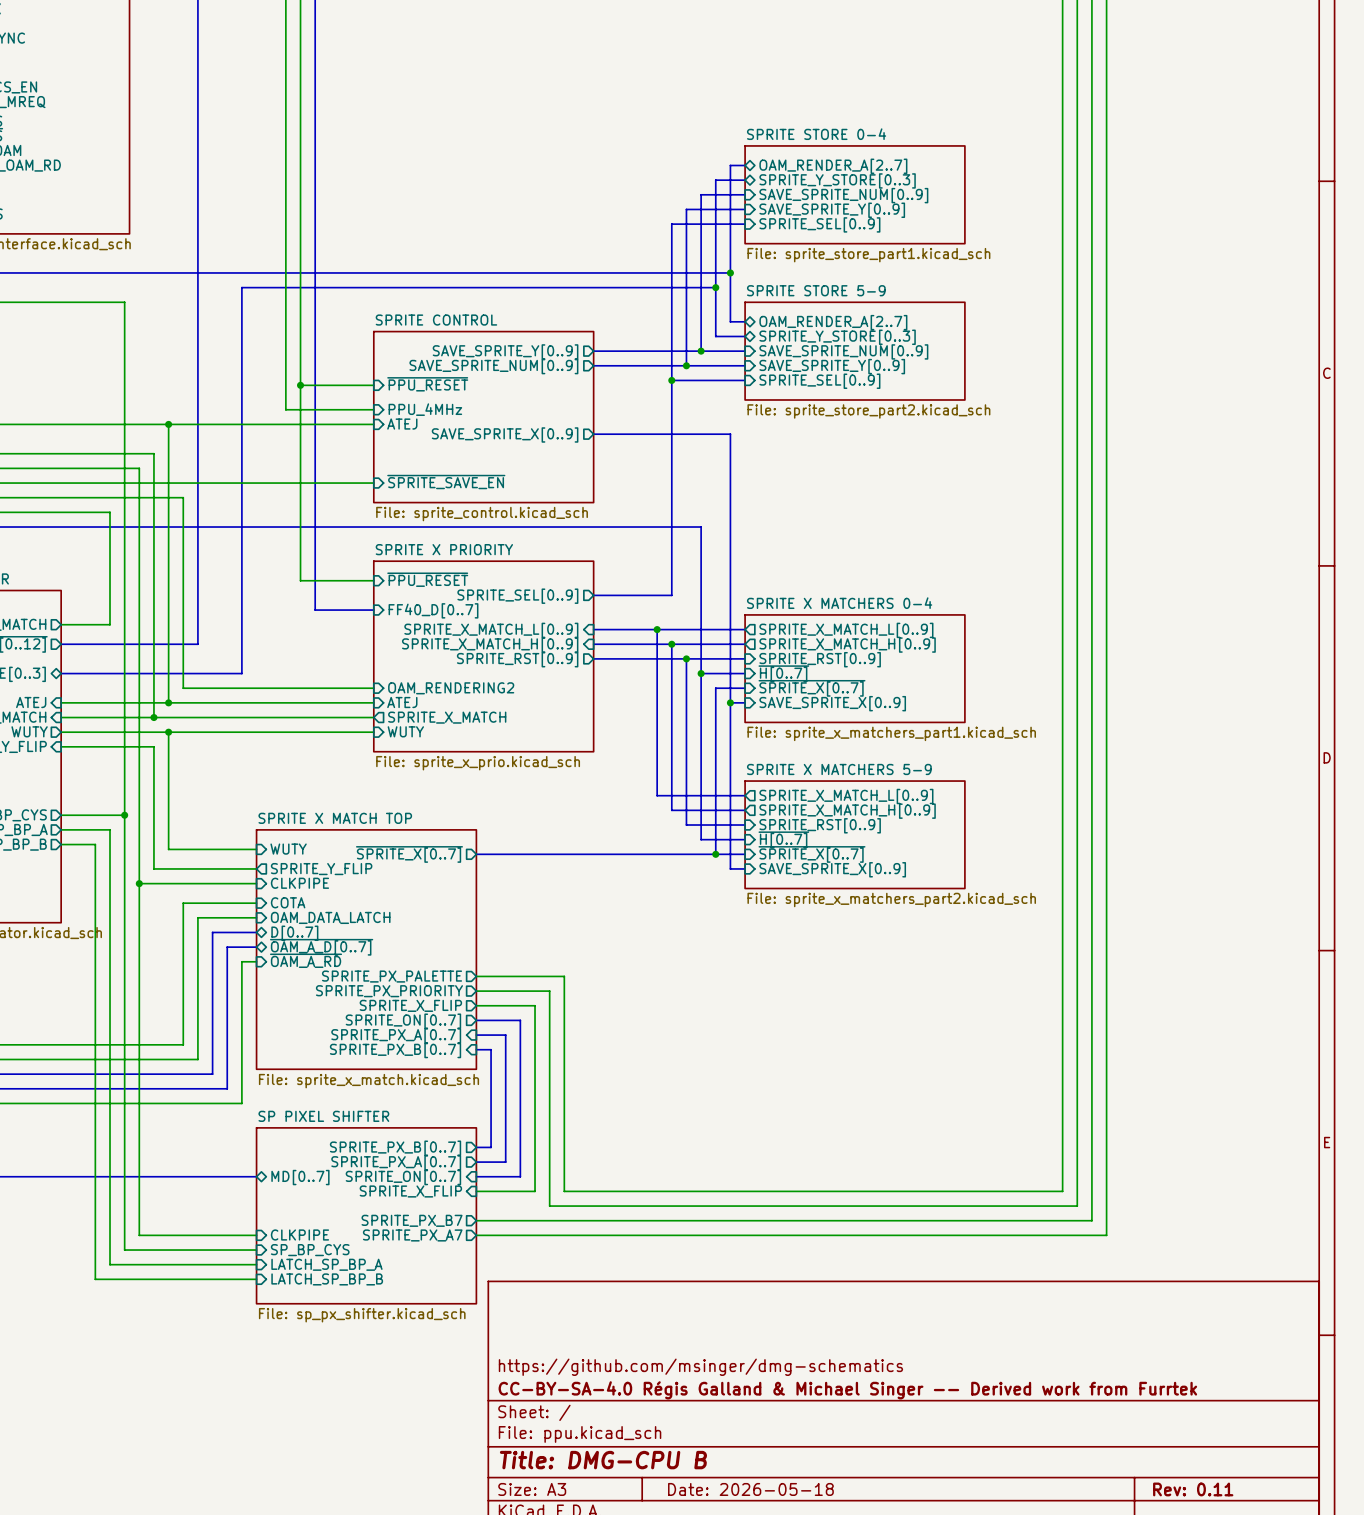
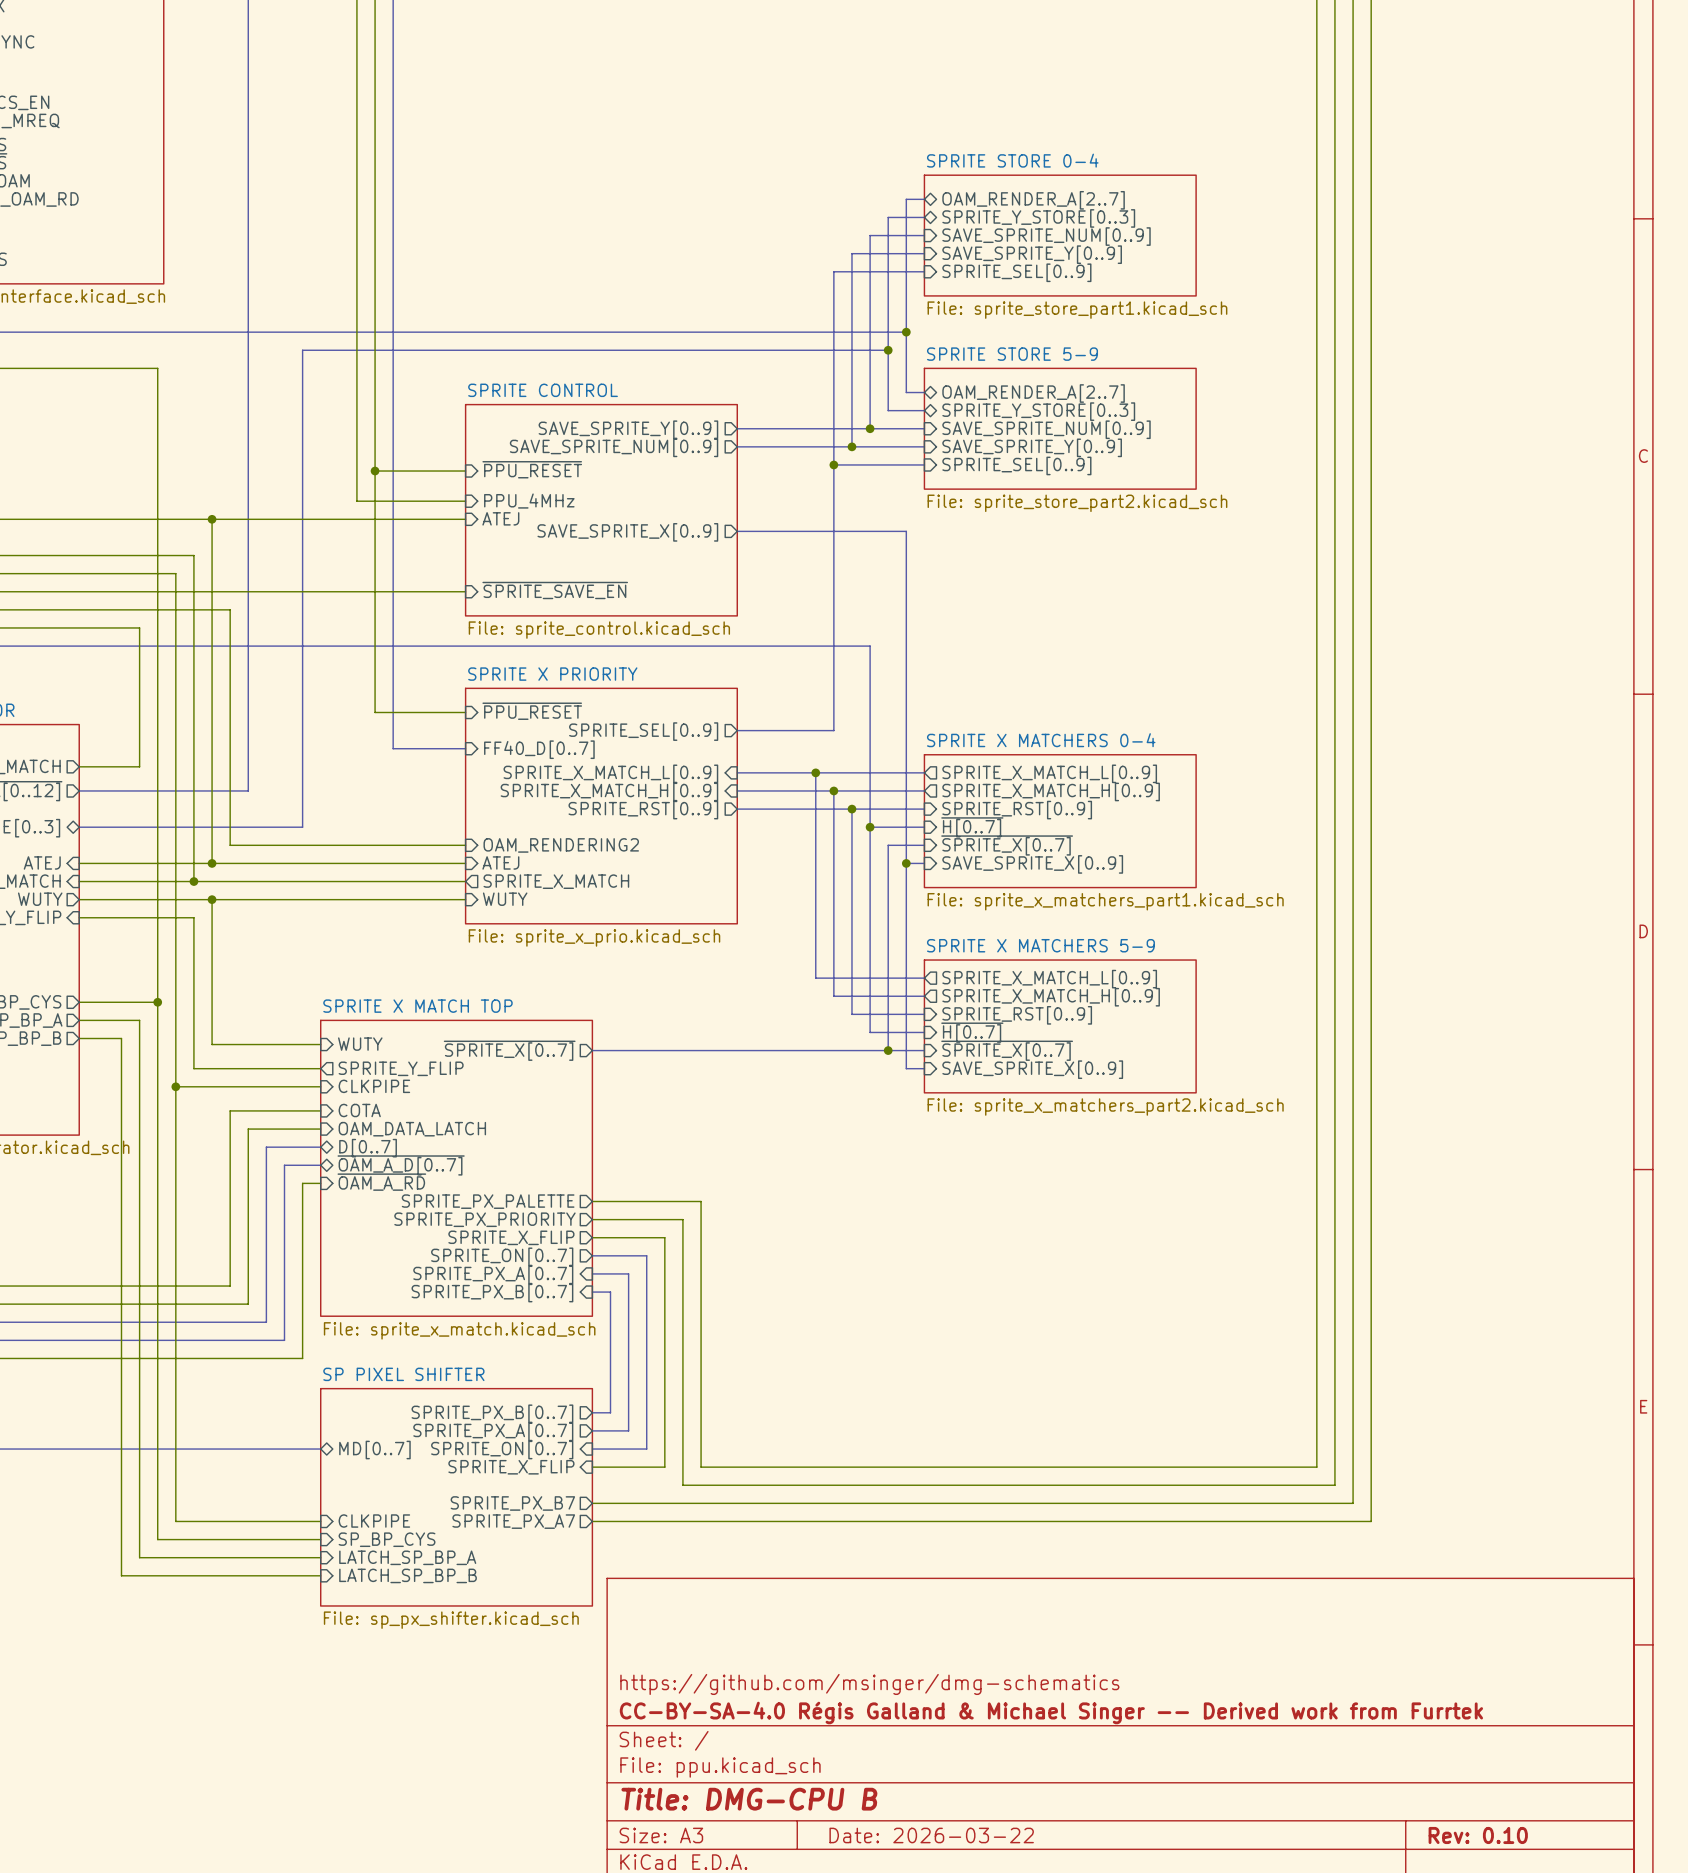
title block: Date: 2026-05-18 (750, 1489) -> Date: 2026-03-22 (931, 1835)
title block: Rev: 0.11 (1193, 1489) -> Rev: 0.10 (1478, 1835)

